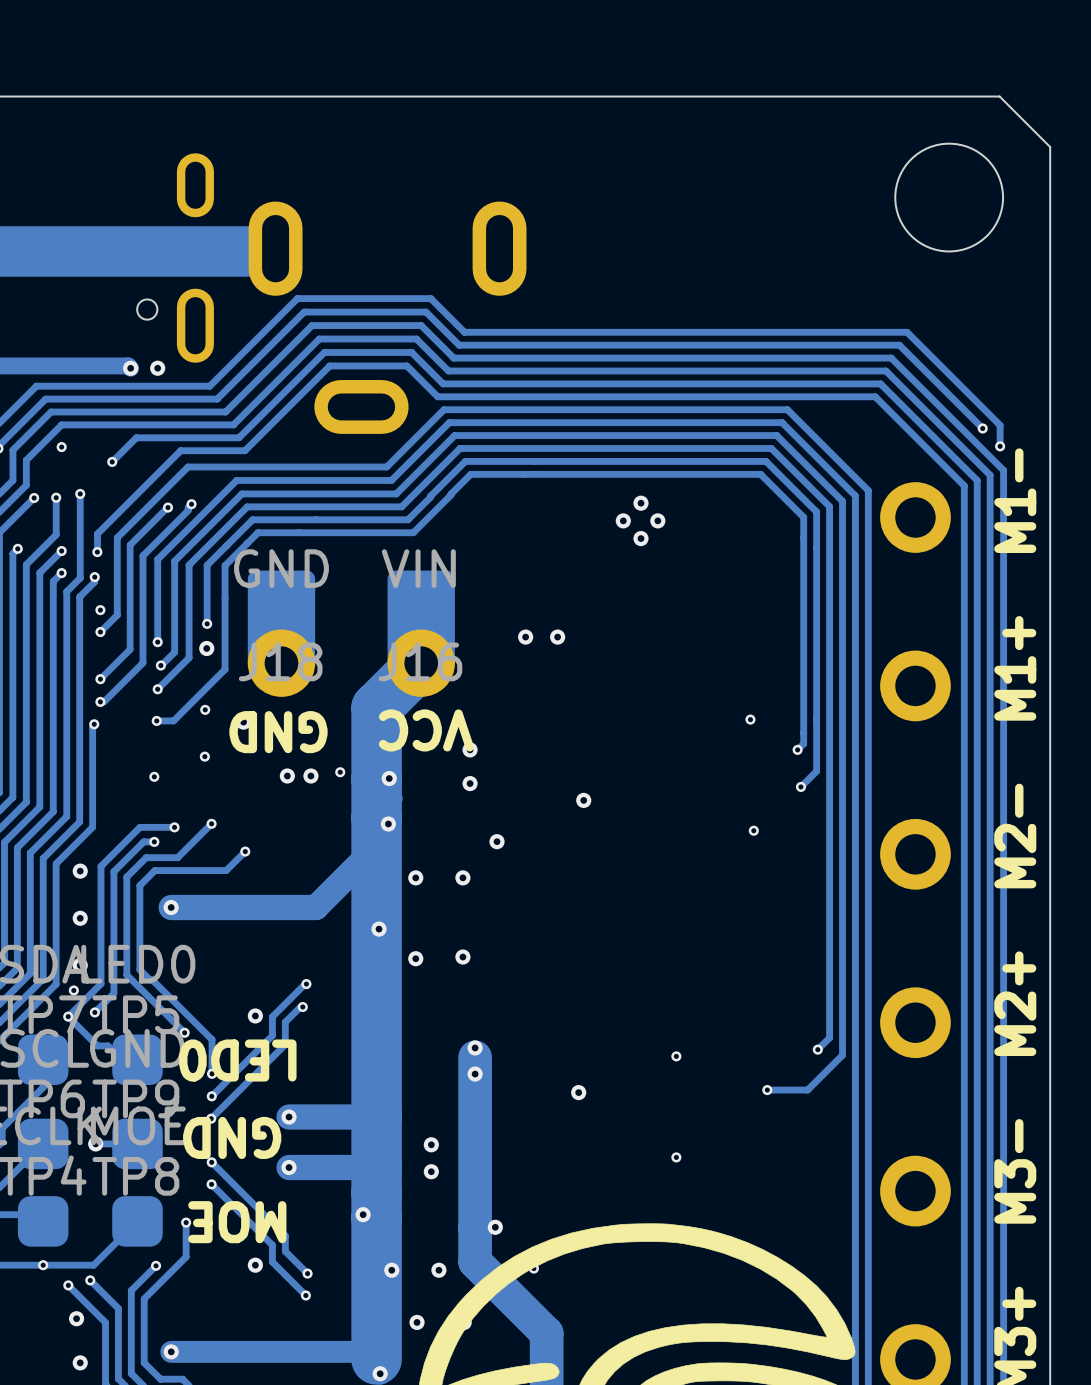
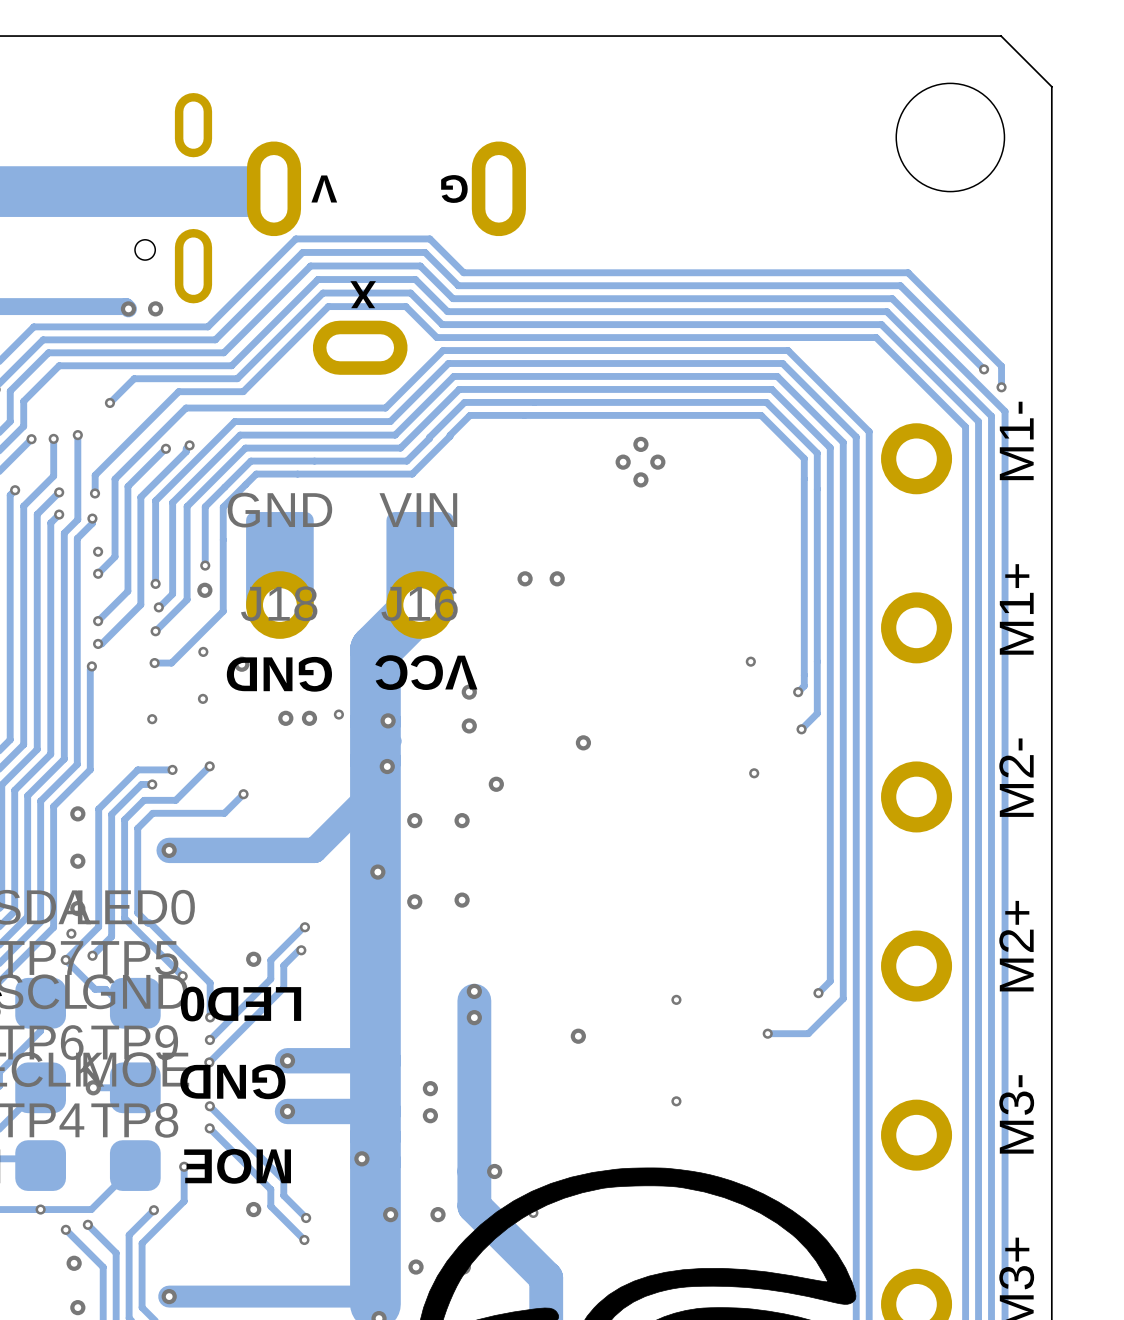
text: none -> V (324, 188)
text: none -> G (454, 189)
text: none -> X (363, 294)
via: (61, 447) -> none

